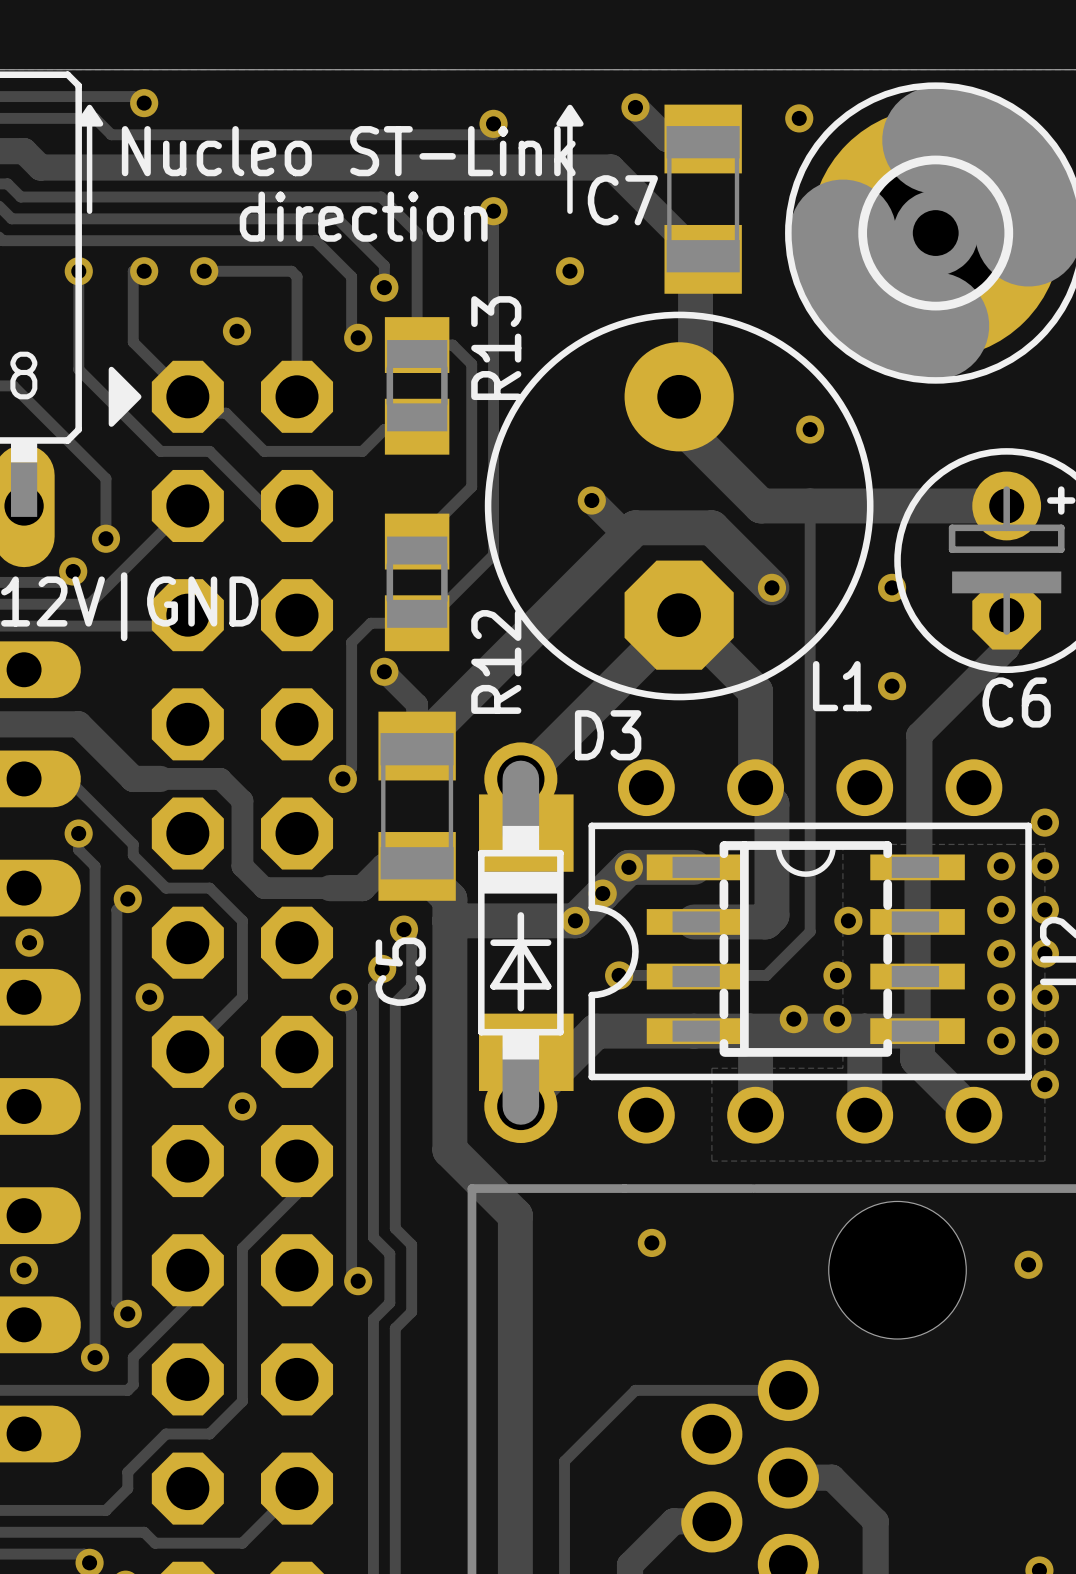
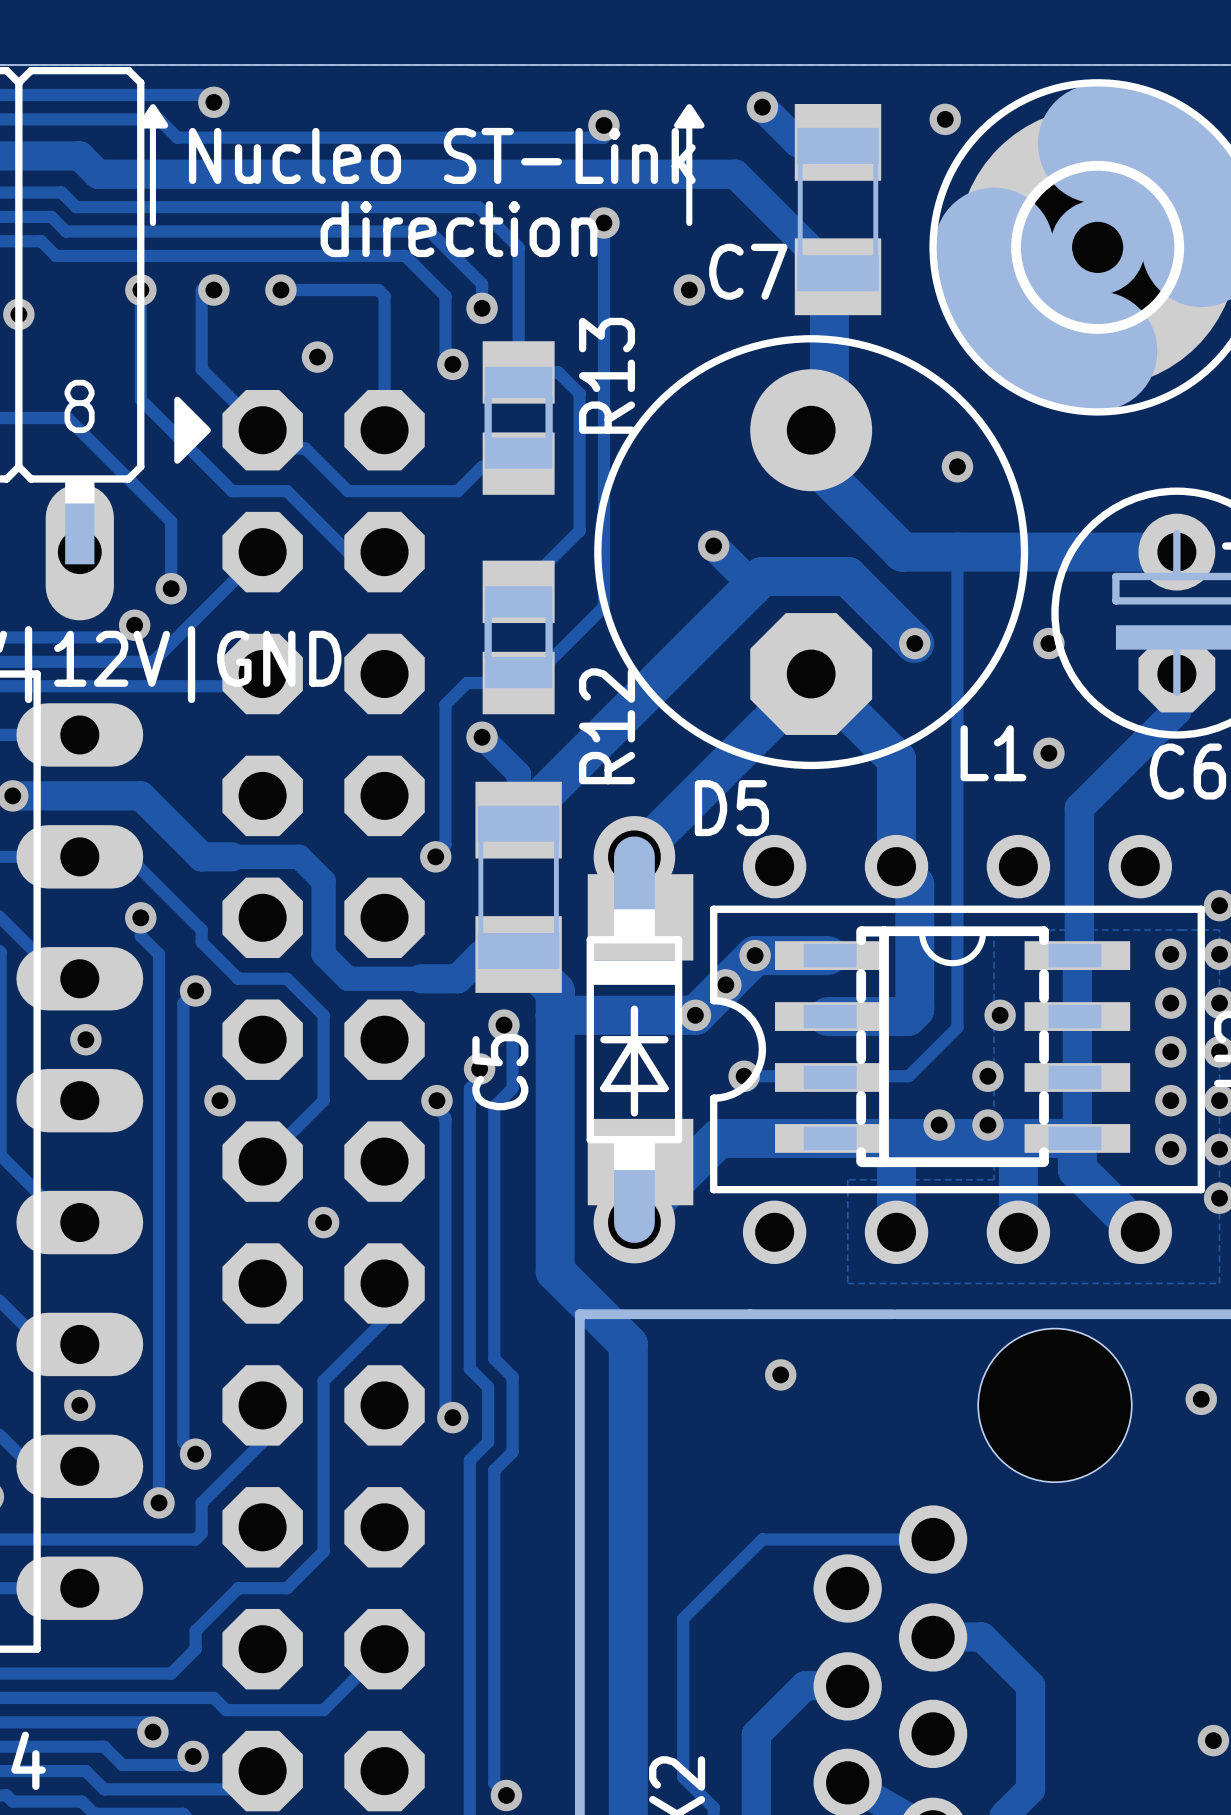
C7 name position: C7 (622, 200) -> C7 (748, 271)
D3 name: D3 (608, 735) -> D5 (731, 808)

